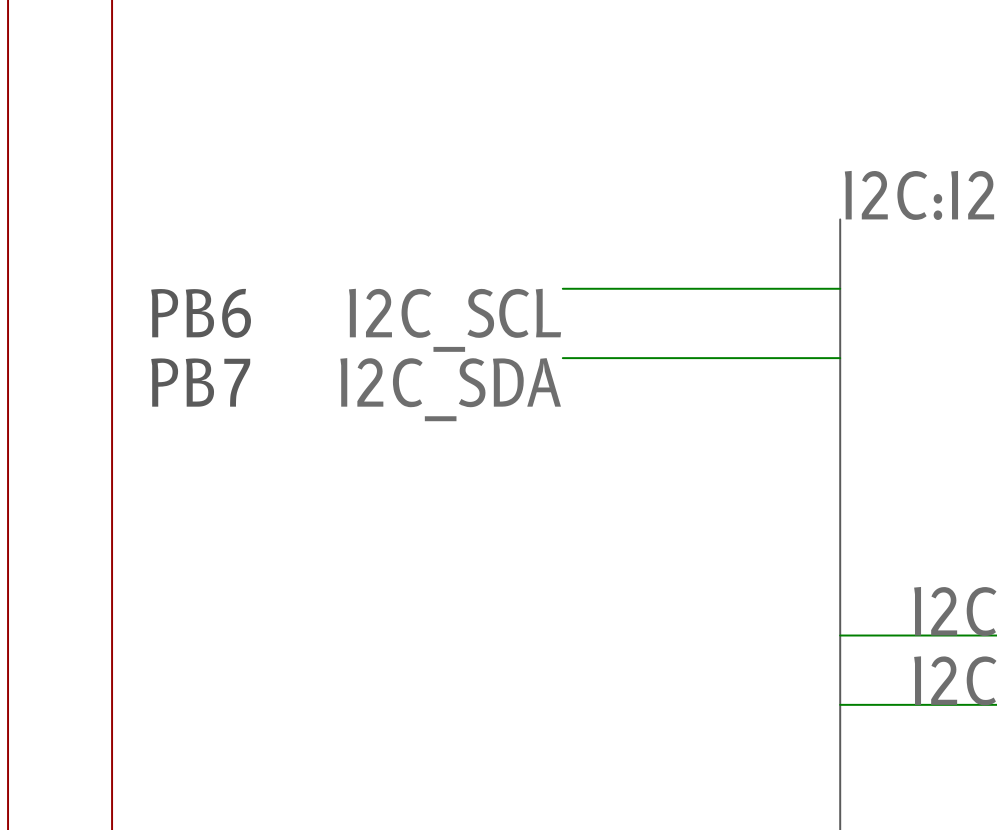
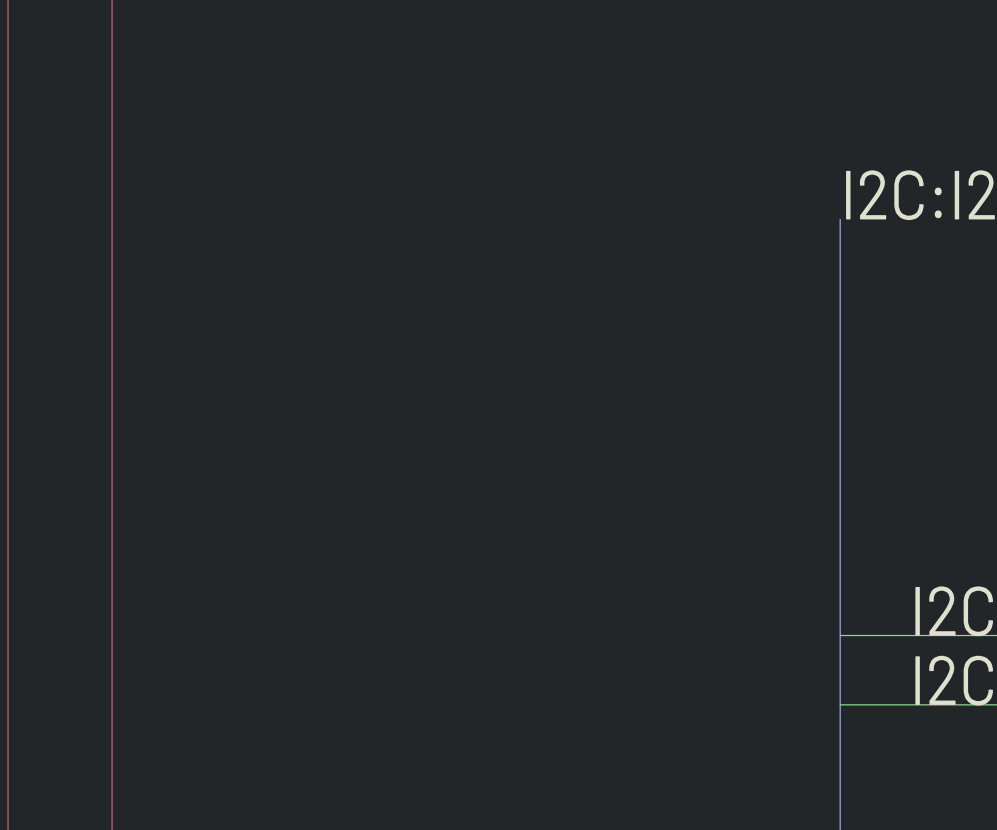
wire: (562, 288) (840, 288) -> none
text: PB6 (201, 313) -> none
label: I2C_SCL (455, 320) -> none
wire: (562, 358) (840, 358) -> none
text: PB7 (200, 382) -> none
label: I2C_SDA (450, 389) -> none

